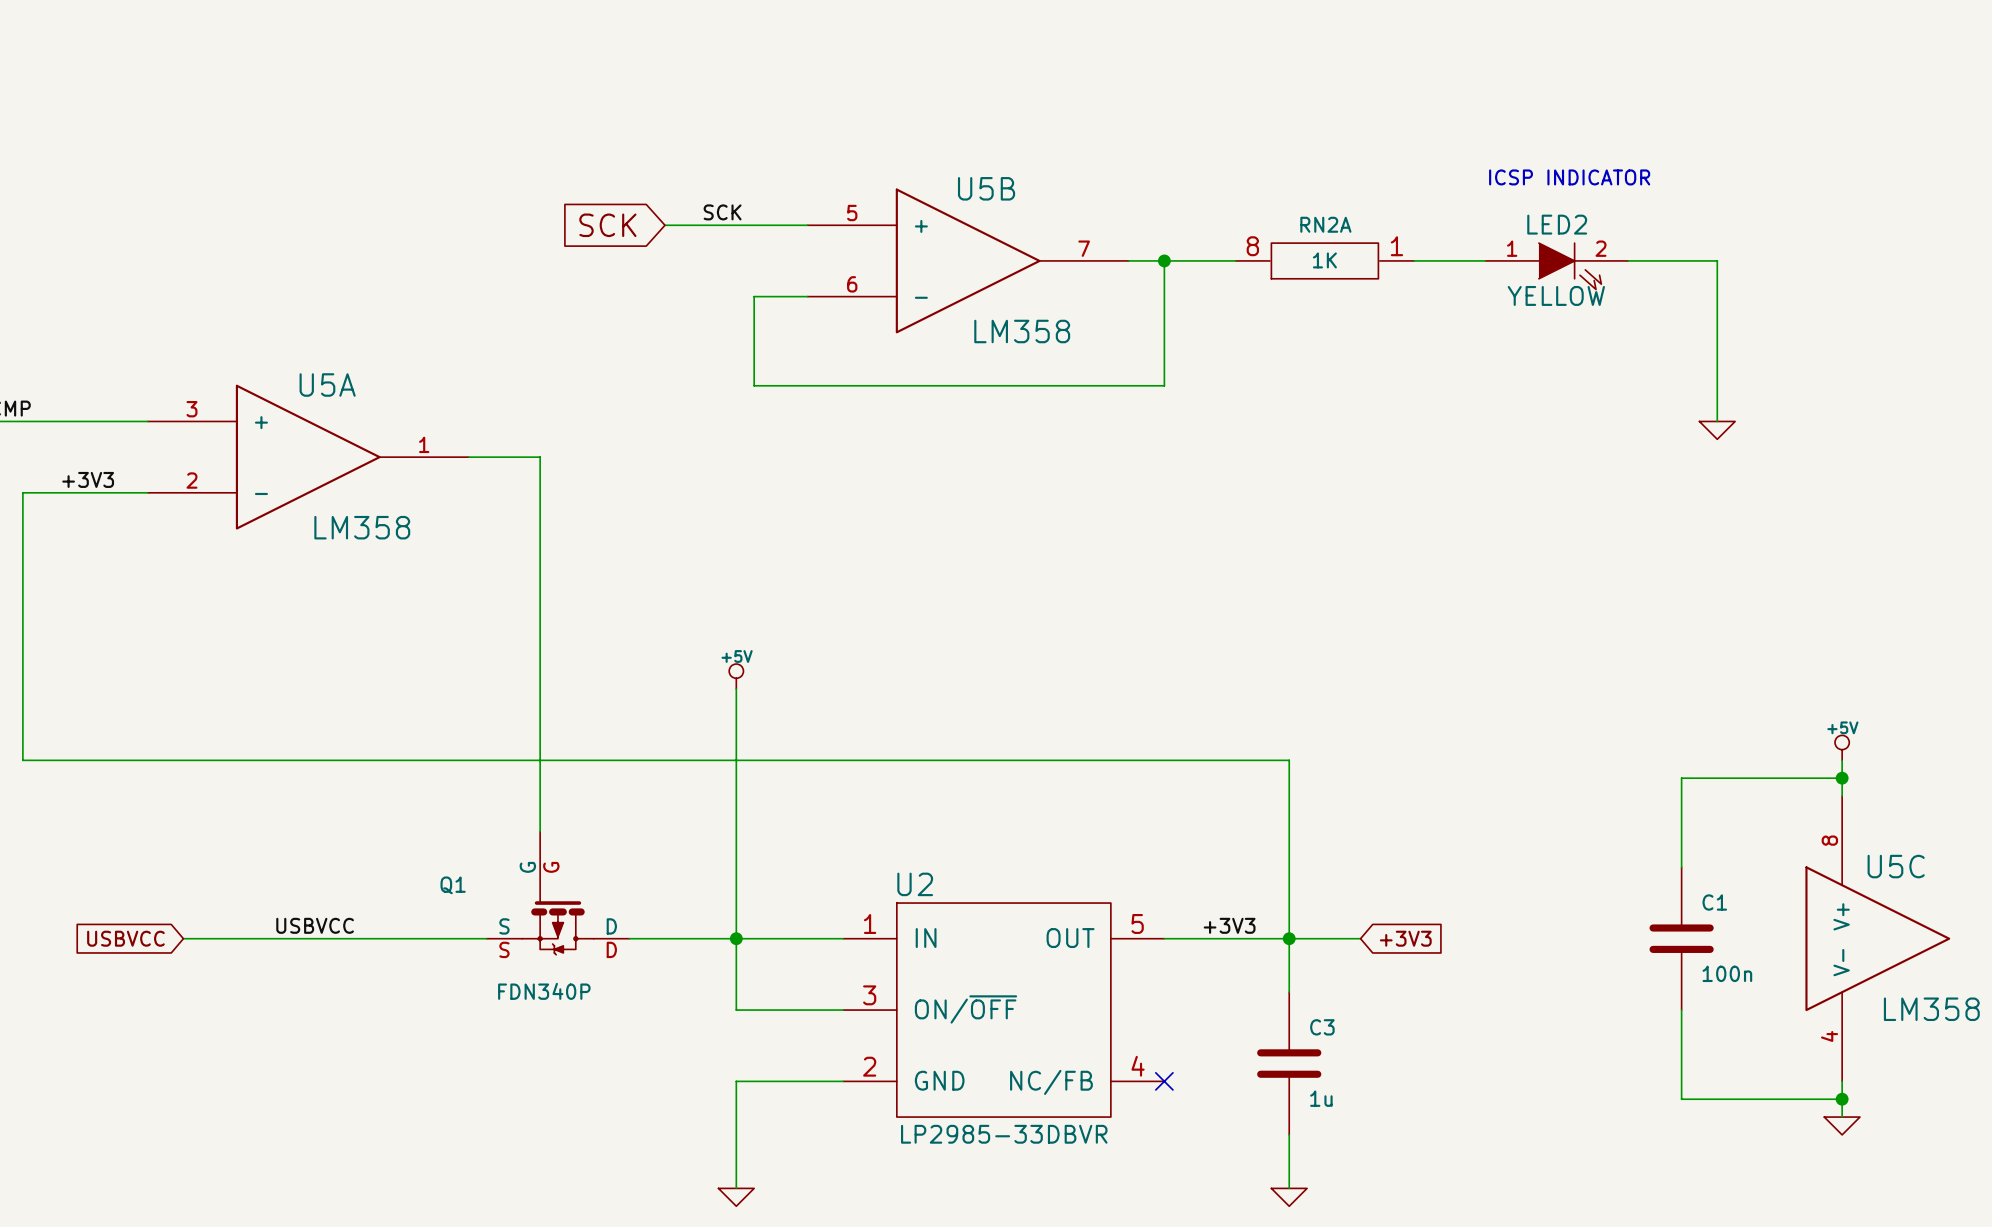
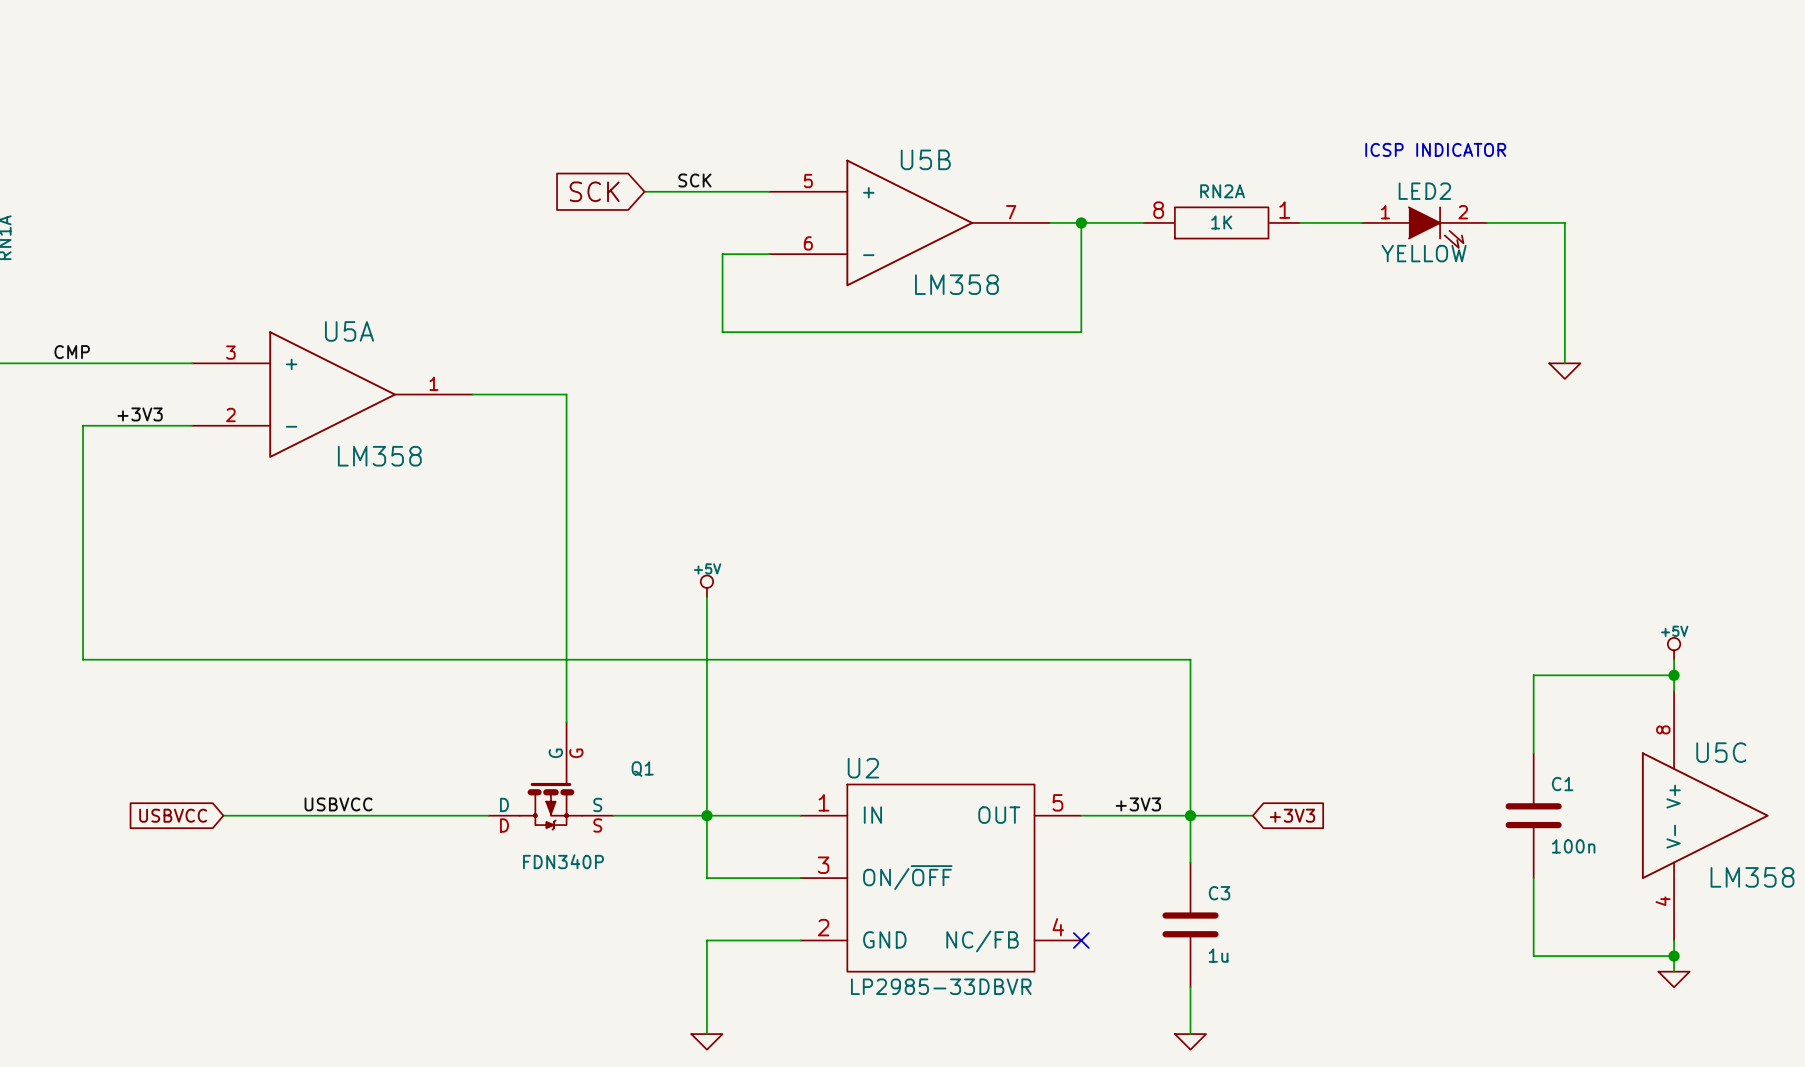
wire: (540, 457) (540, 831) -> (535, 394) (566, 394) (566, 722)
Q1 flip: as is (557, 928) -> left-right (550, 806)

